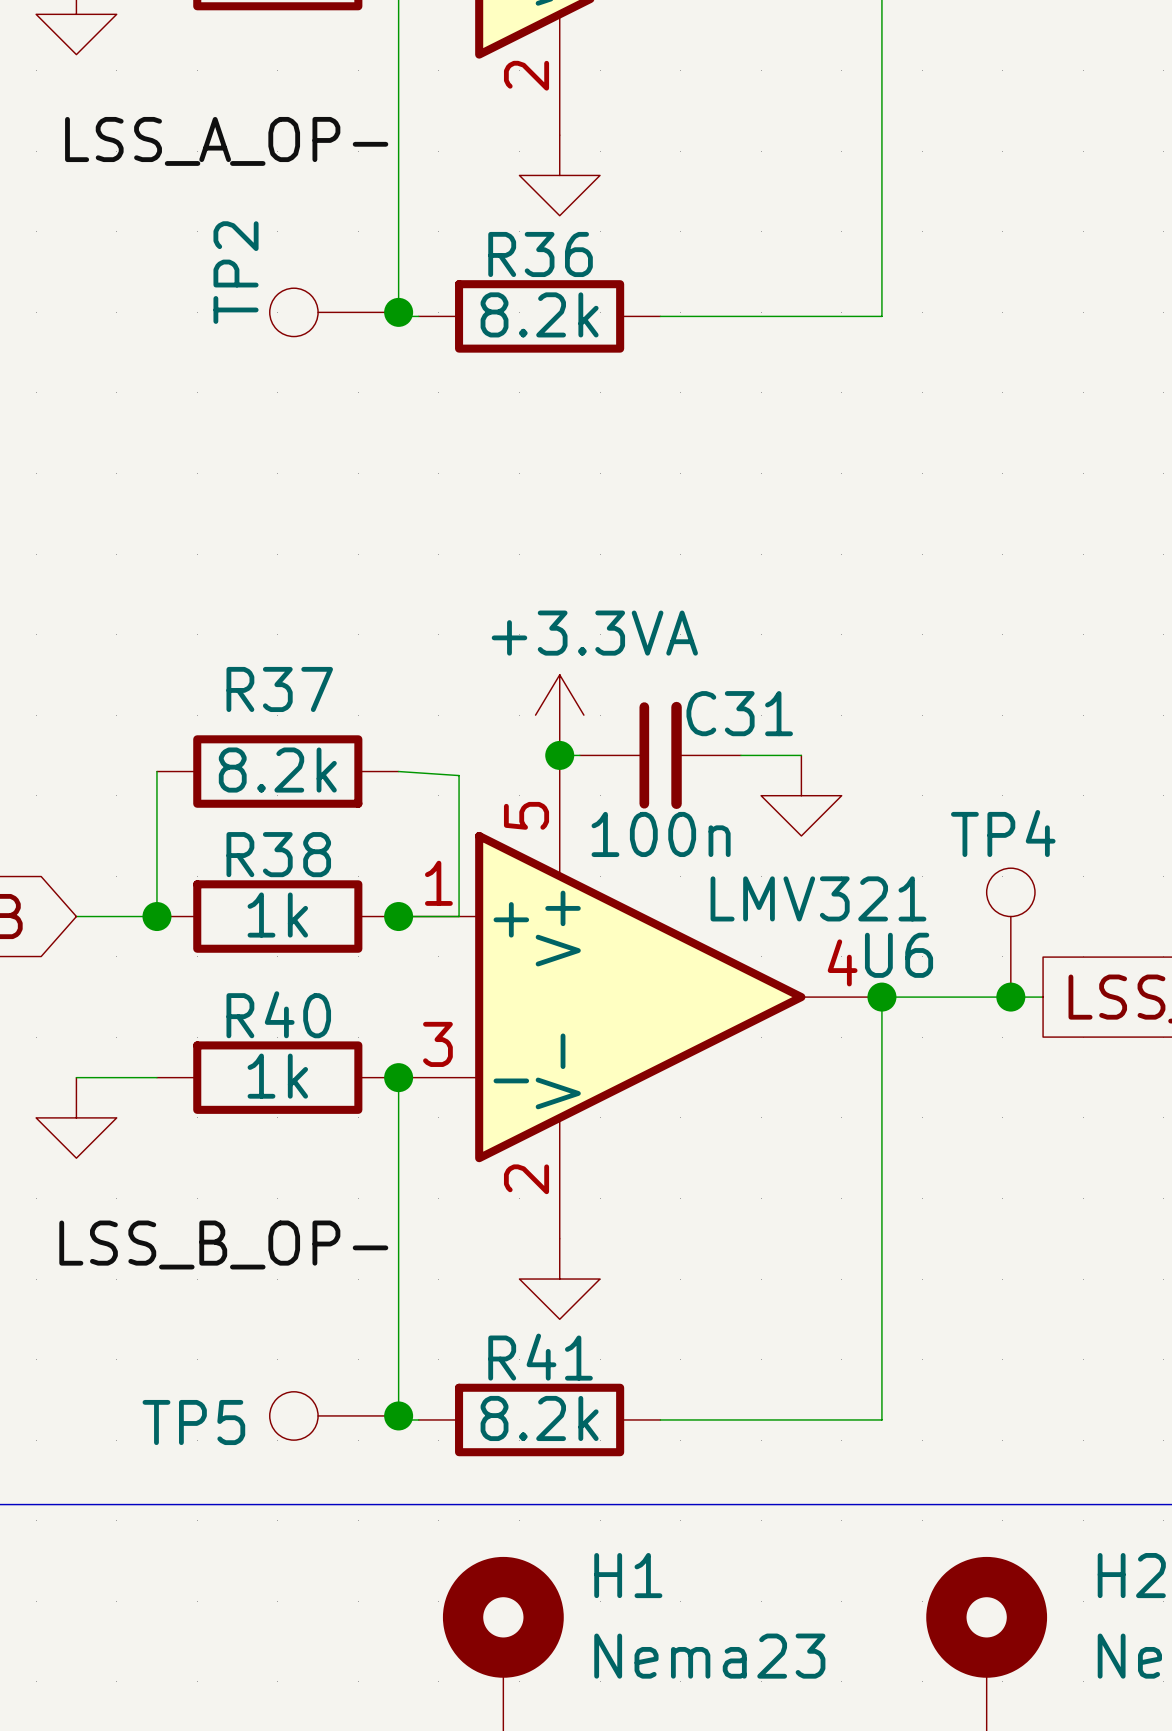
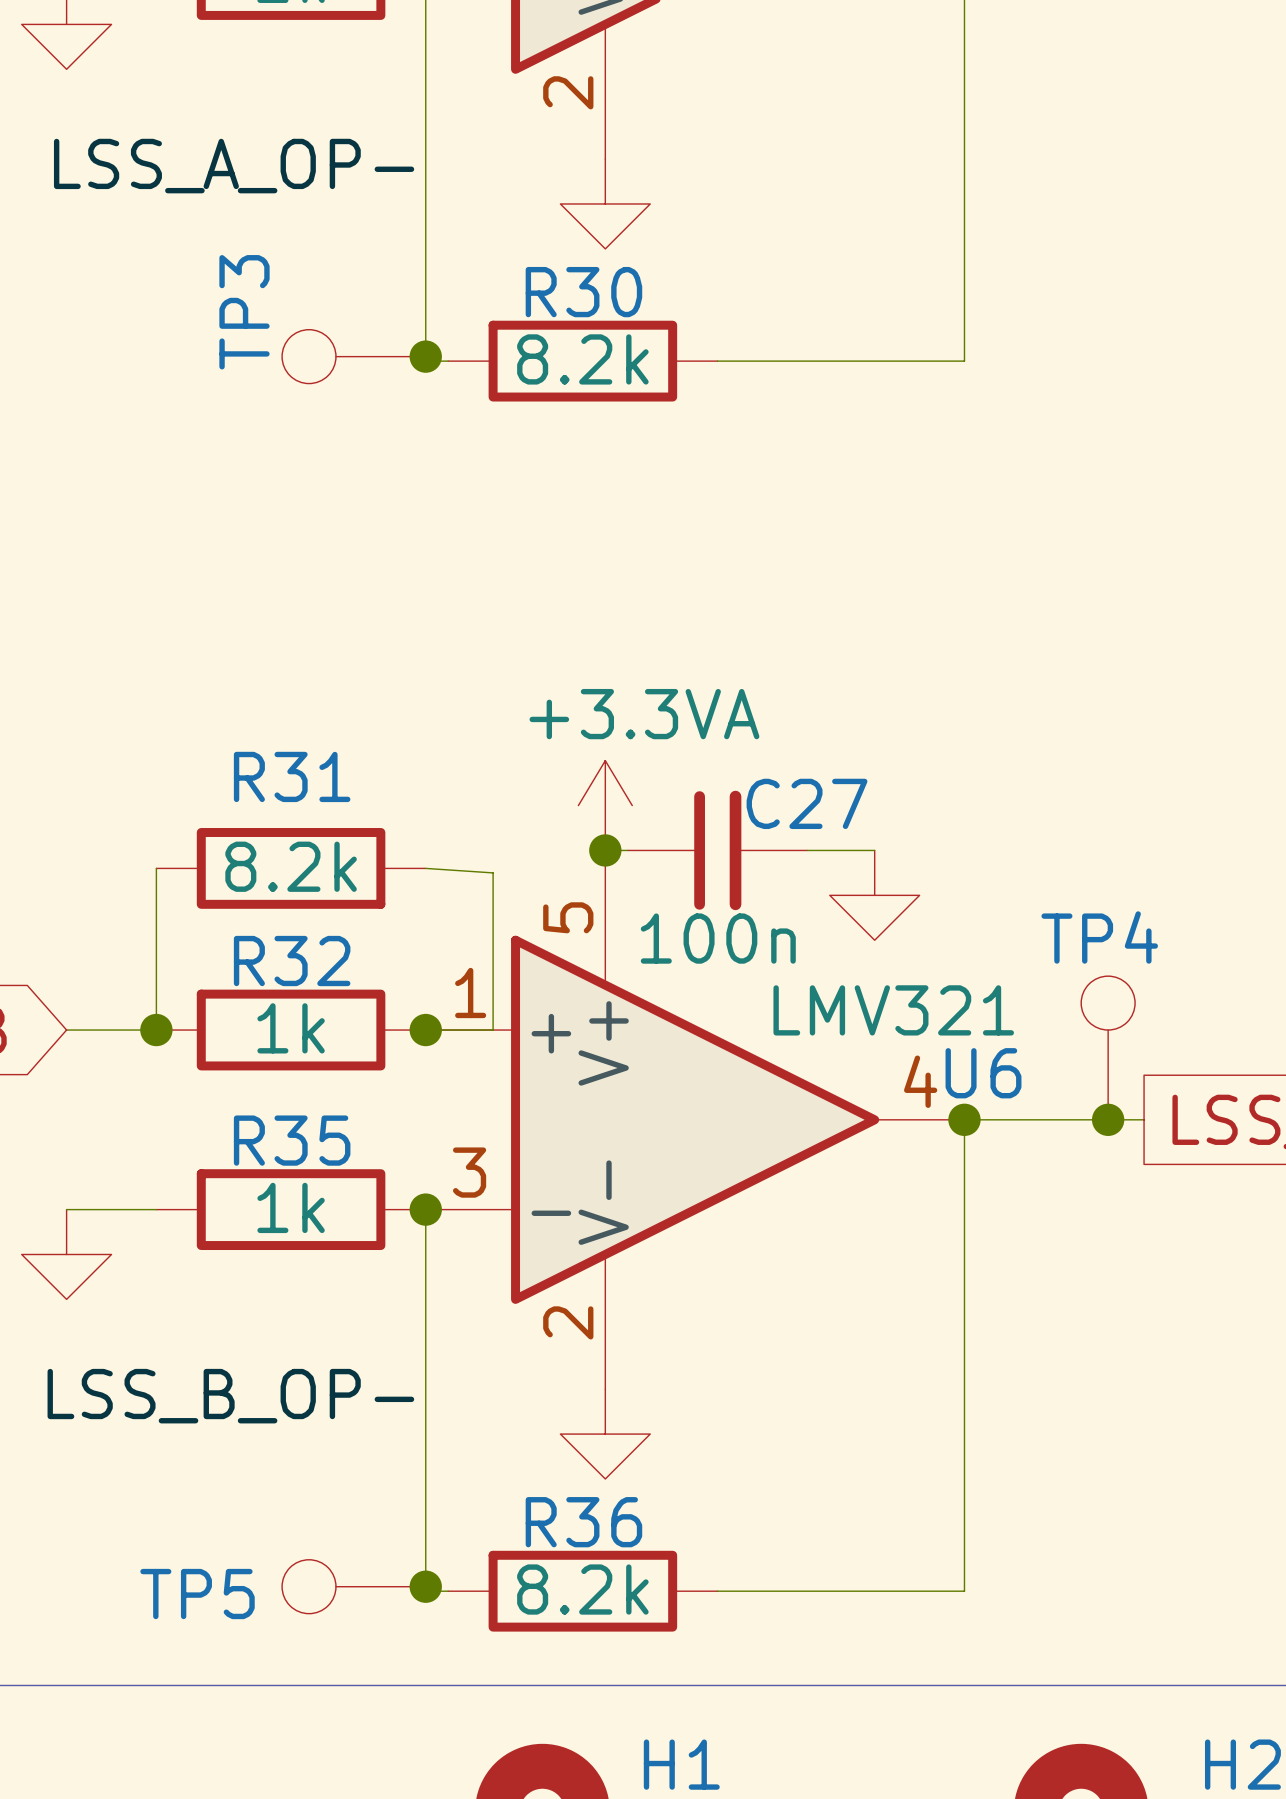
R36 name: R36 (540, 254) -> R30 (583, 292)
TP2 name: TP2 (236, 272) -> TP3 (244, 312)
R37 name: R37 (279, 689) -> R31 (292, 776)
C31 name: C31 (739, 713) -> C27 (807, 803)
R38 name: R38 (278, 854) -> R32 (292, 961)
R40 name: R40 (278, 1014) -> R35 (292, 1140)
R41 name: R41 (540, 1357) -> R36 (583, 1522)

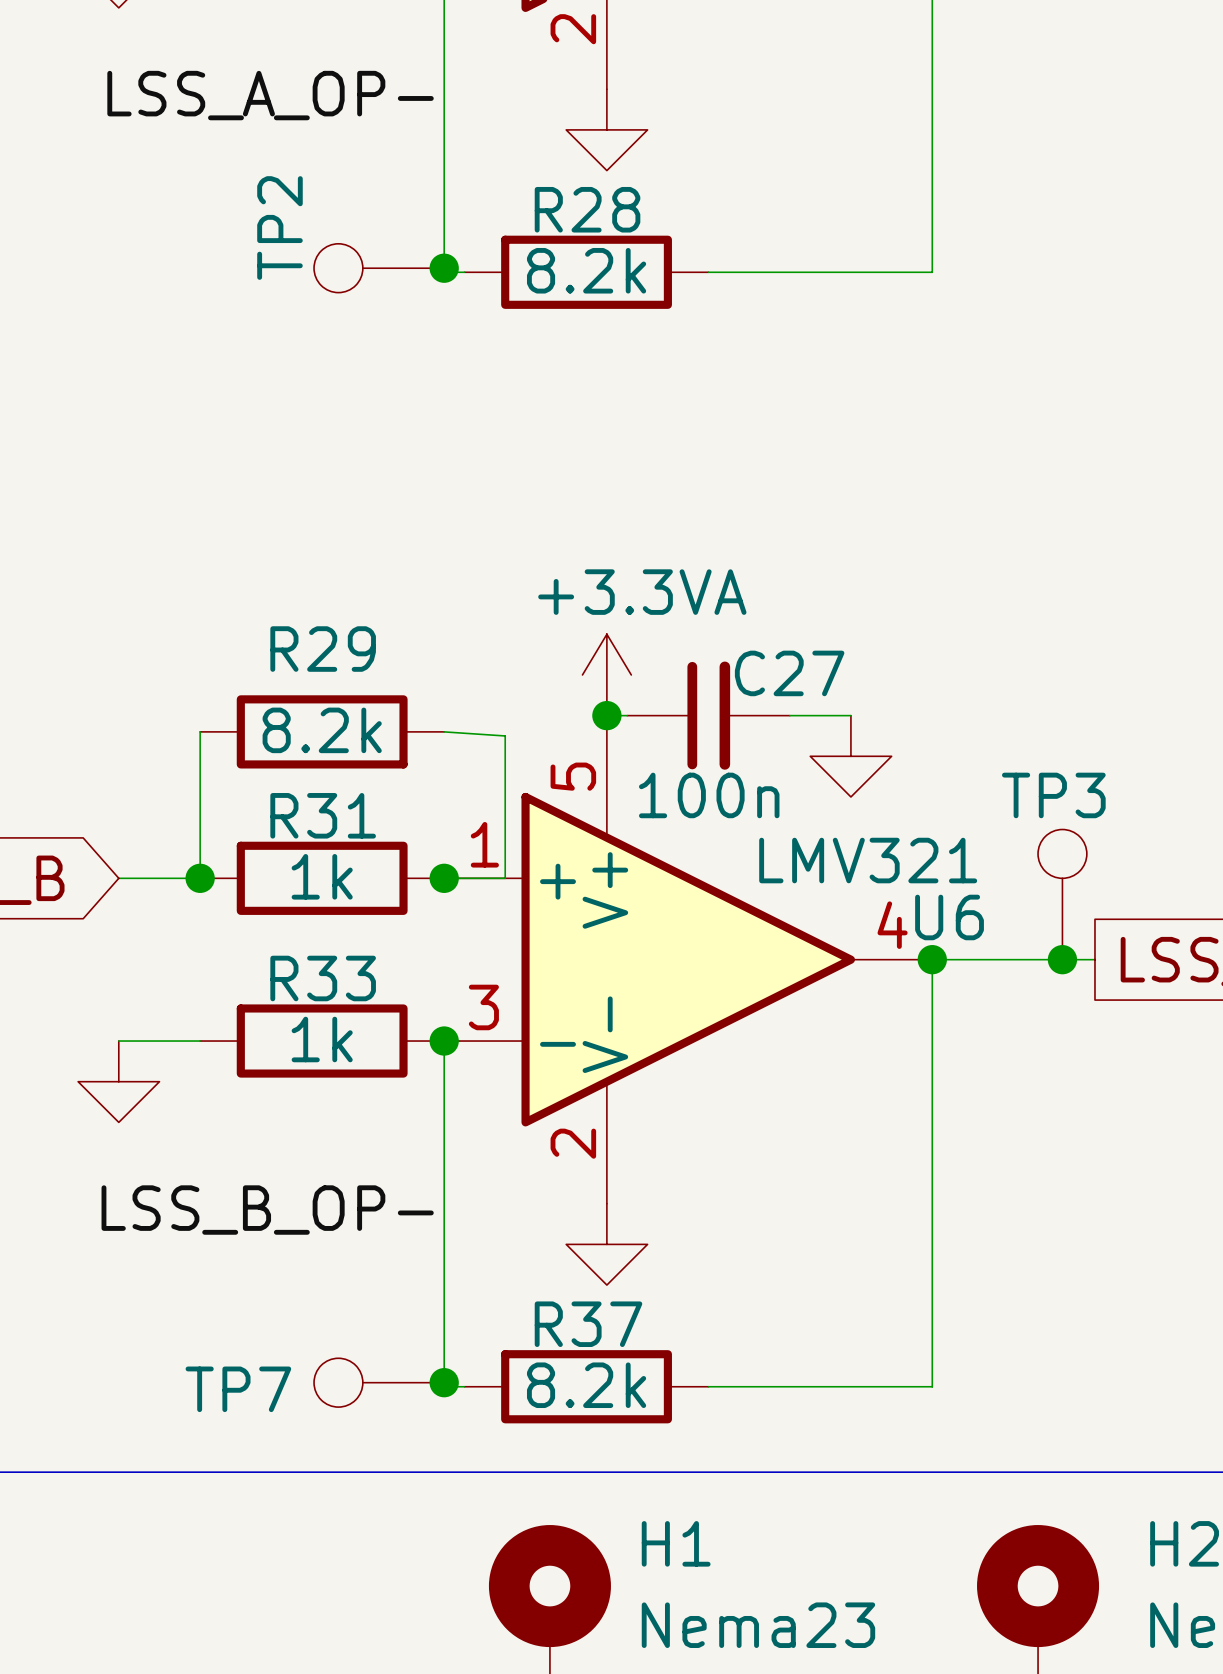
R30 name: R30 (583, 292) -> R28 (587, 209)
TP3 name: TP3 (244, 312) -> TP2 (279, 228)
R31 name: R31 (292, 776) -> R29 (323, 649)
TP4 name: TP4 (1099, 937) -> TP3 (1053, 795)
R32 name: R32 (292, 961) -> R31 (323, 815)
R35 name: R35 (292, 1140) -> R33 (323, 978)
R36 name: R36 (583, 1522) -> R37 (588, 1324)
TP5 name: TP5 (197, 1594) -> TP7 (238, 1389)

